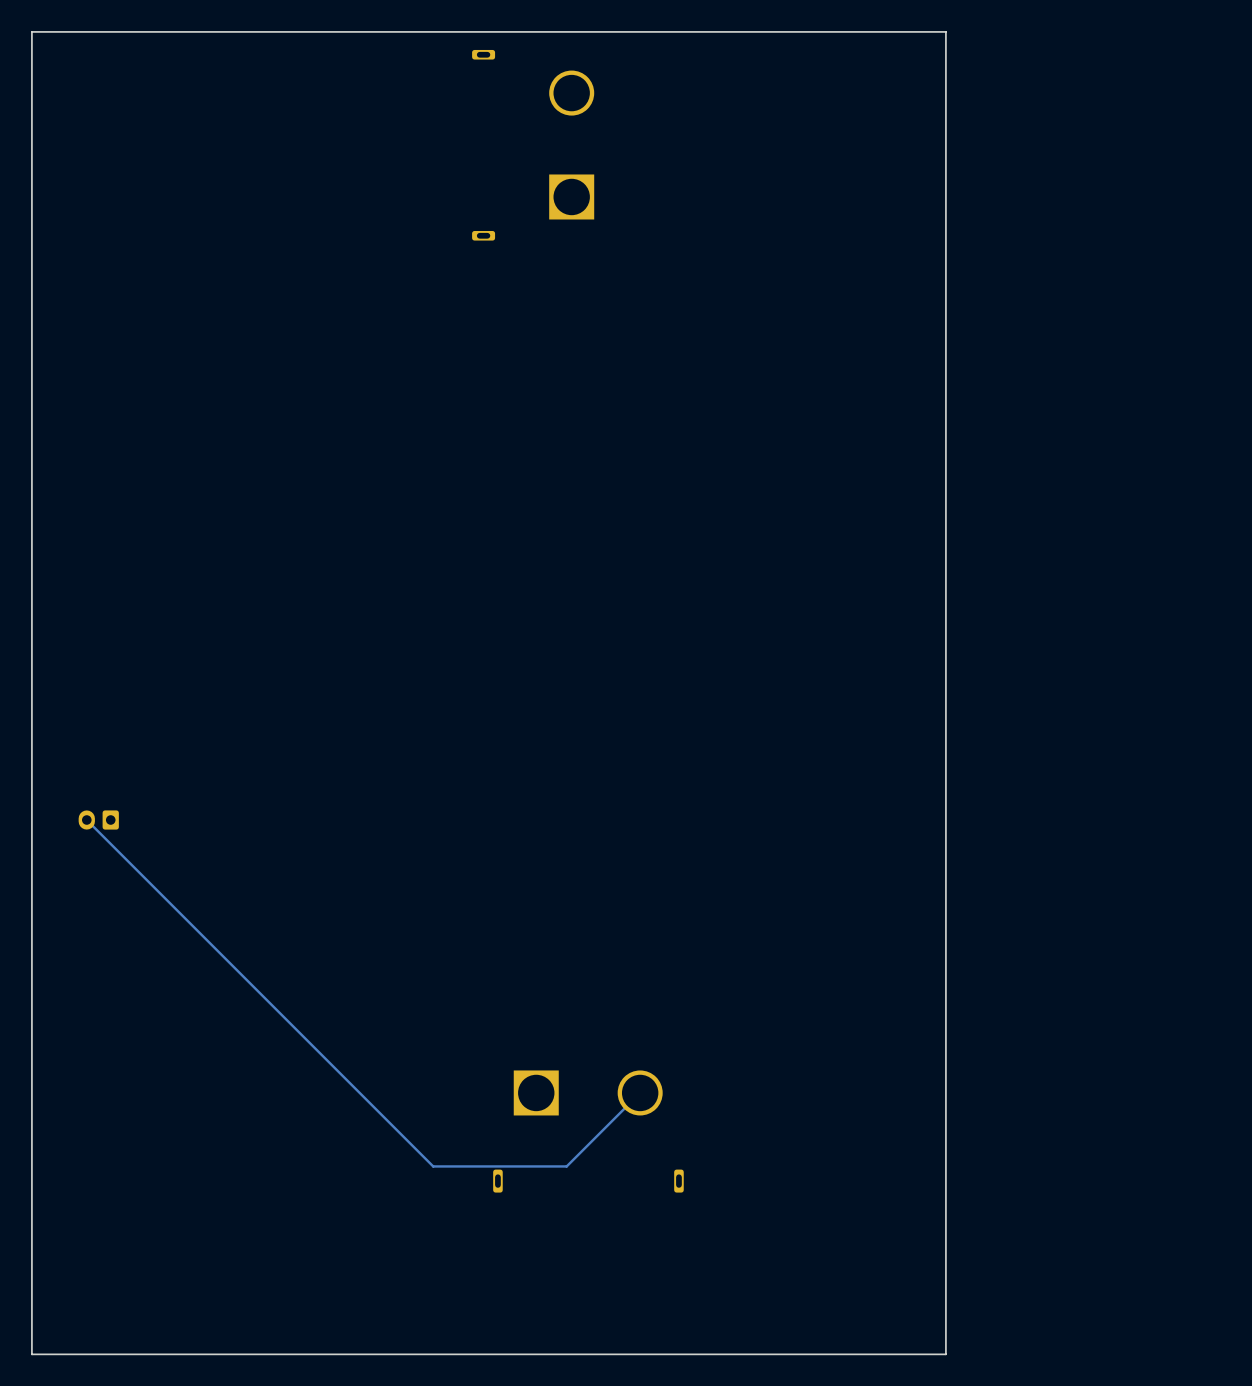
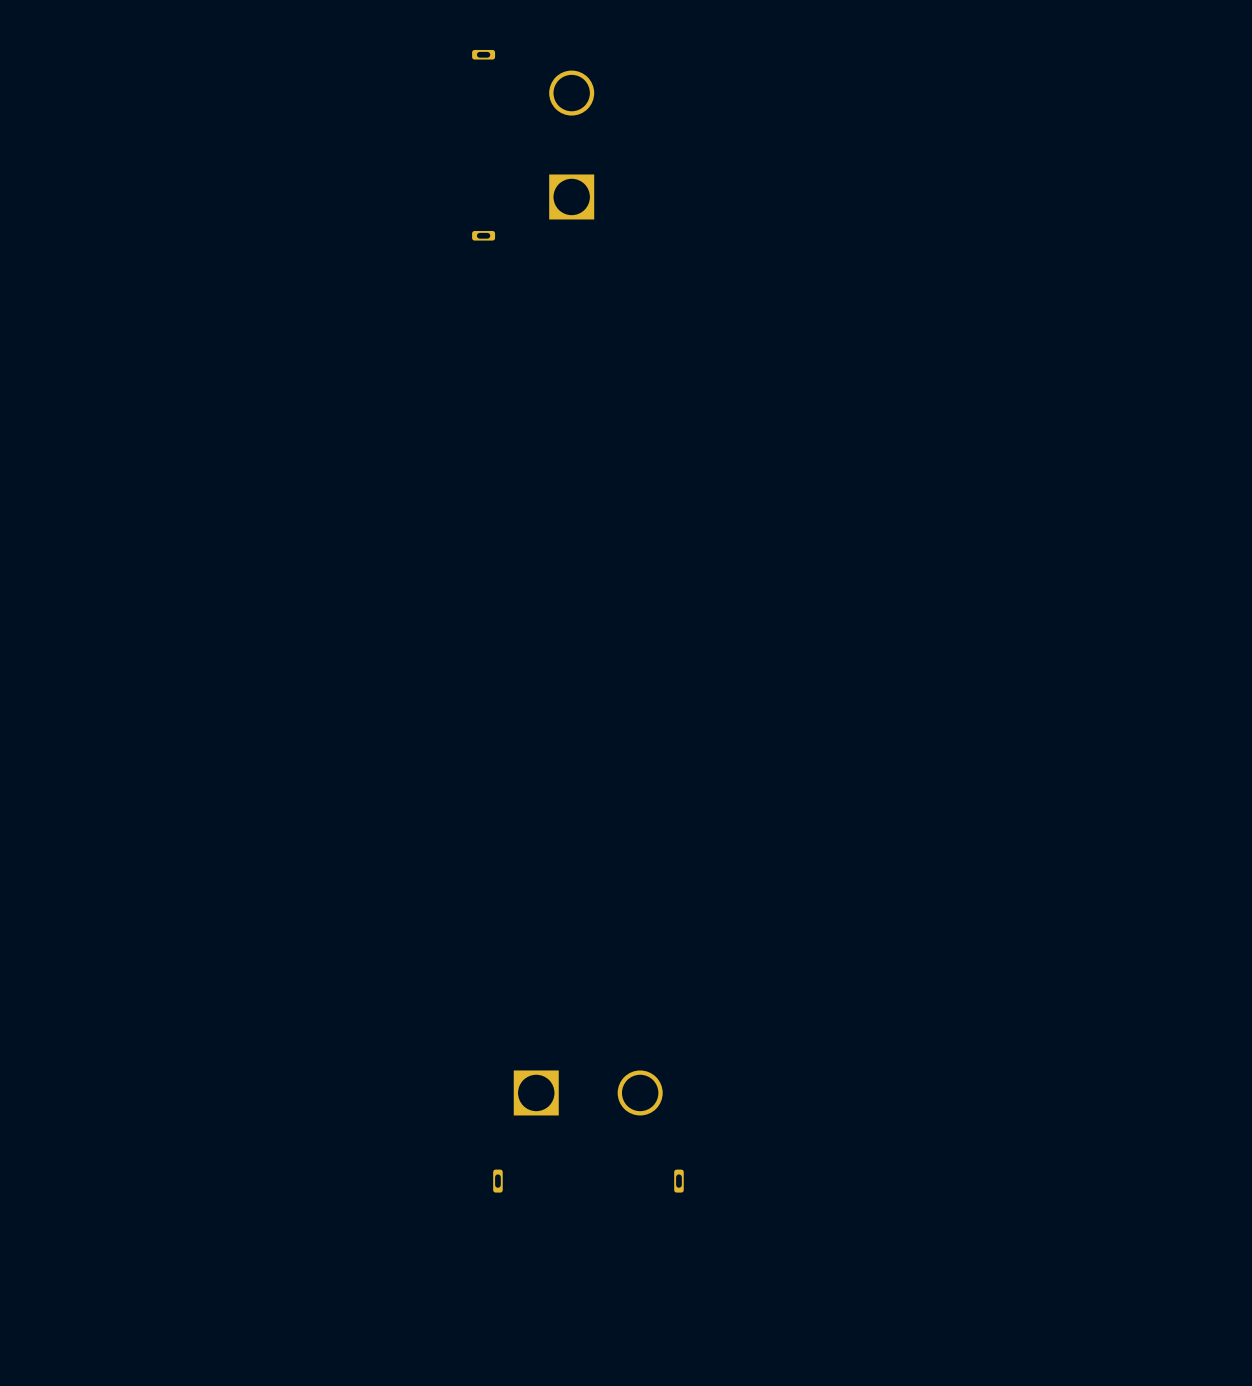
board edge: (945, 31) (31, 31) (31, 1354) (945, 1354) (945, 31) -> none
track: (86, 820) (433, 1166) (566, 1166) (640, 1092) -> none
part: (98, 820) -> none

